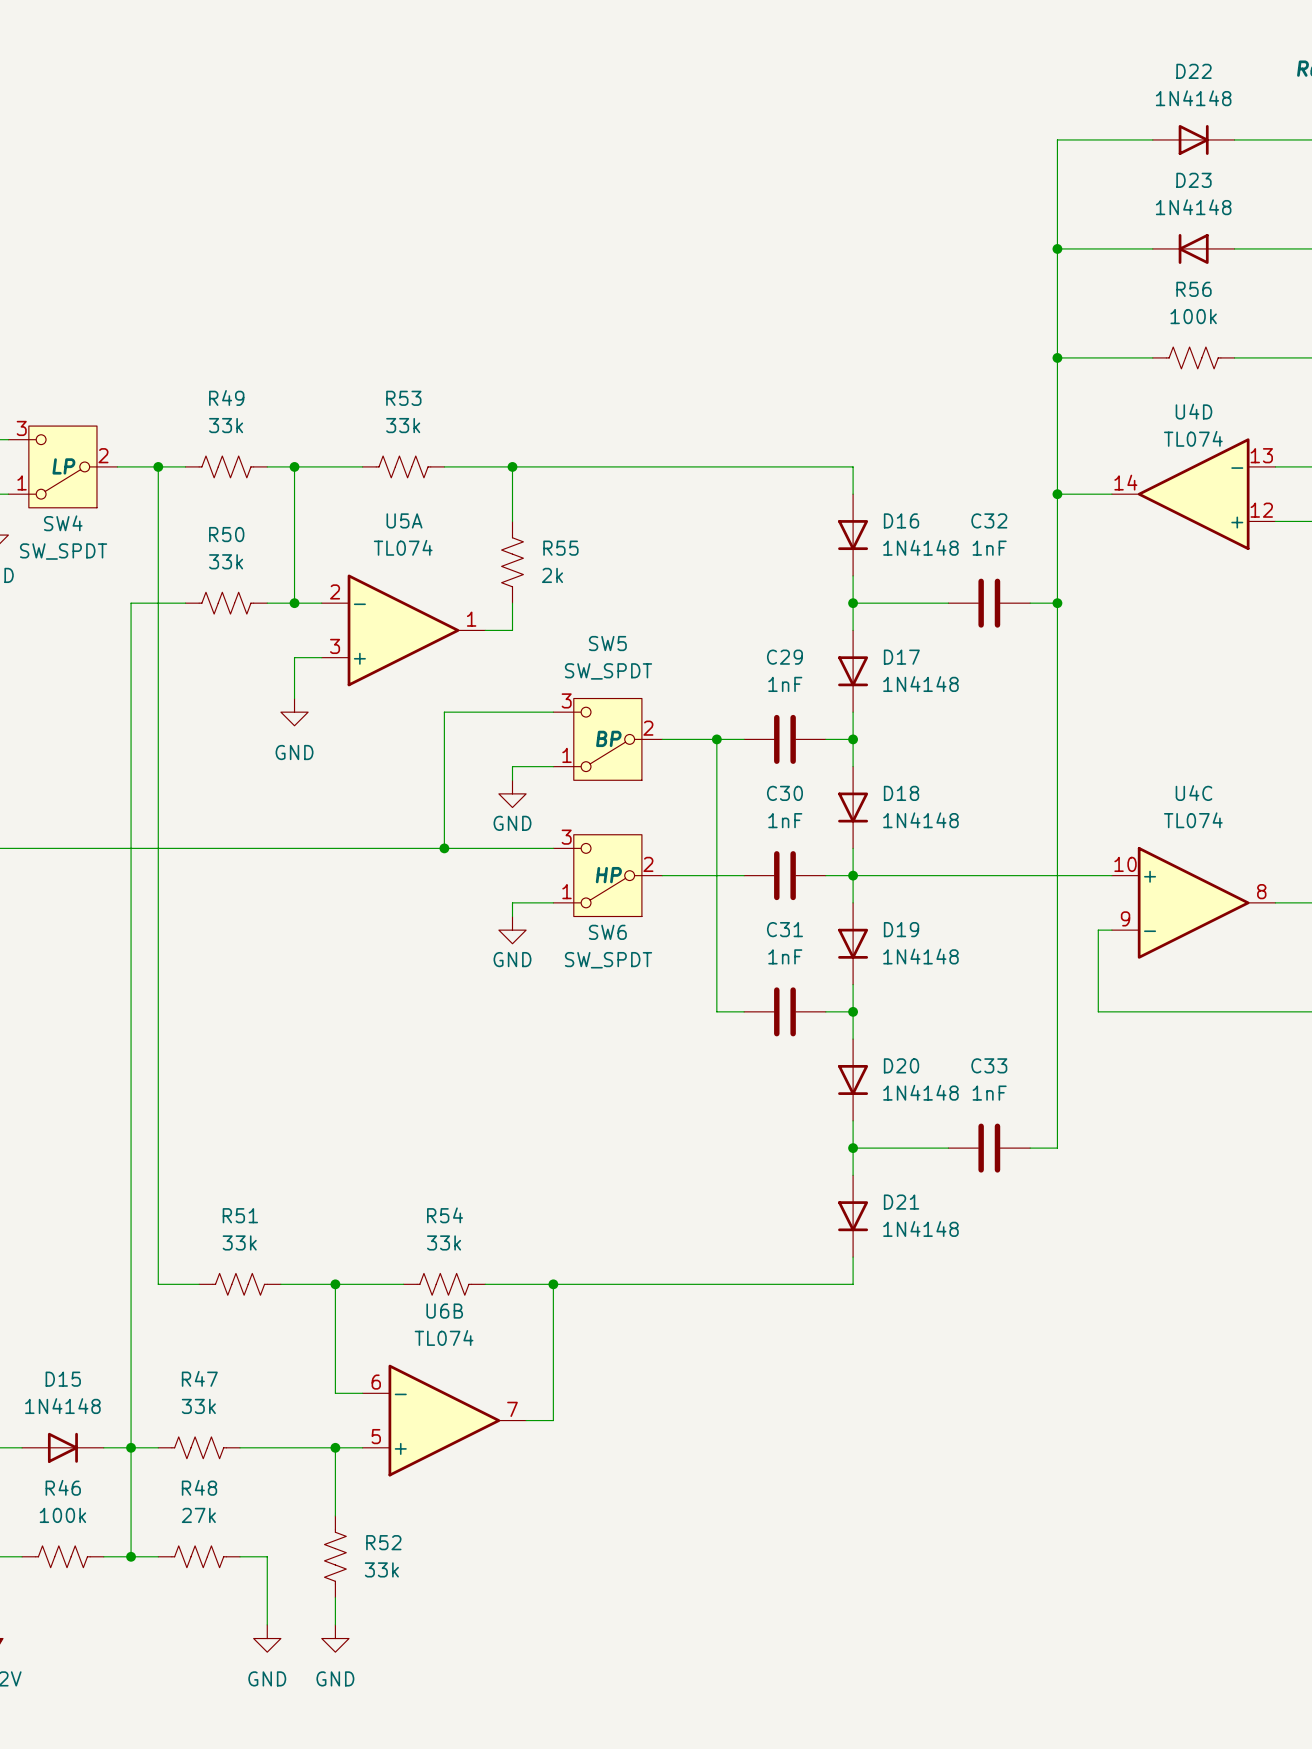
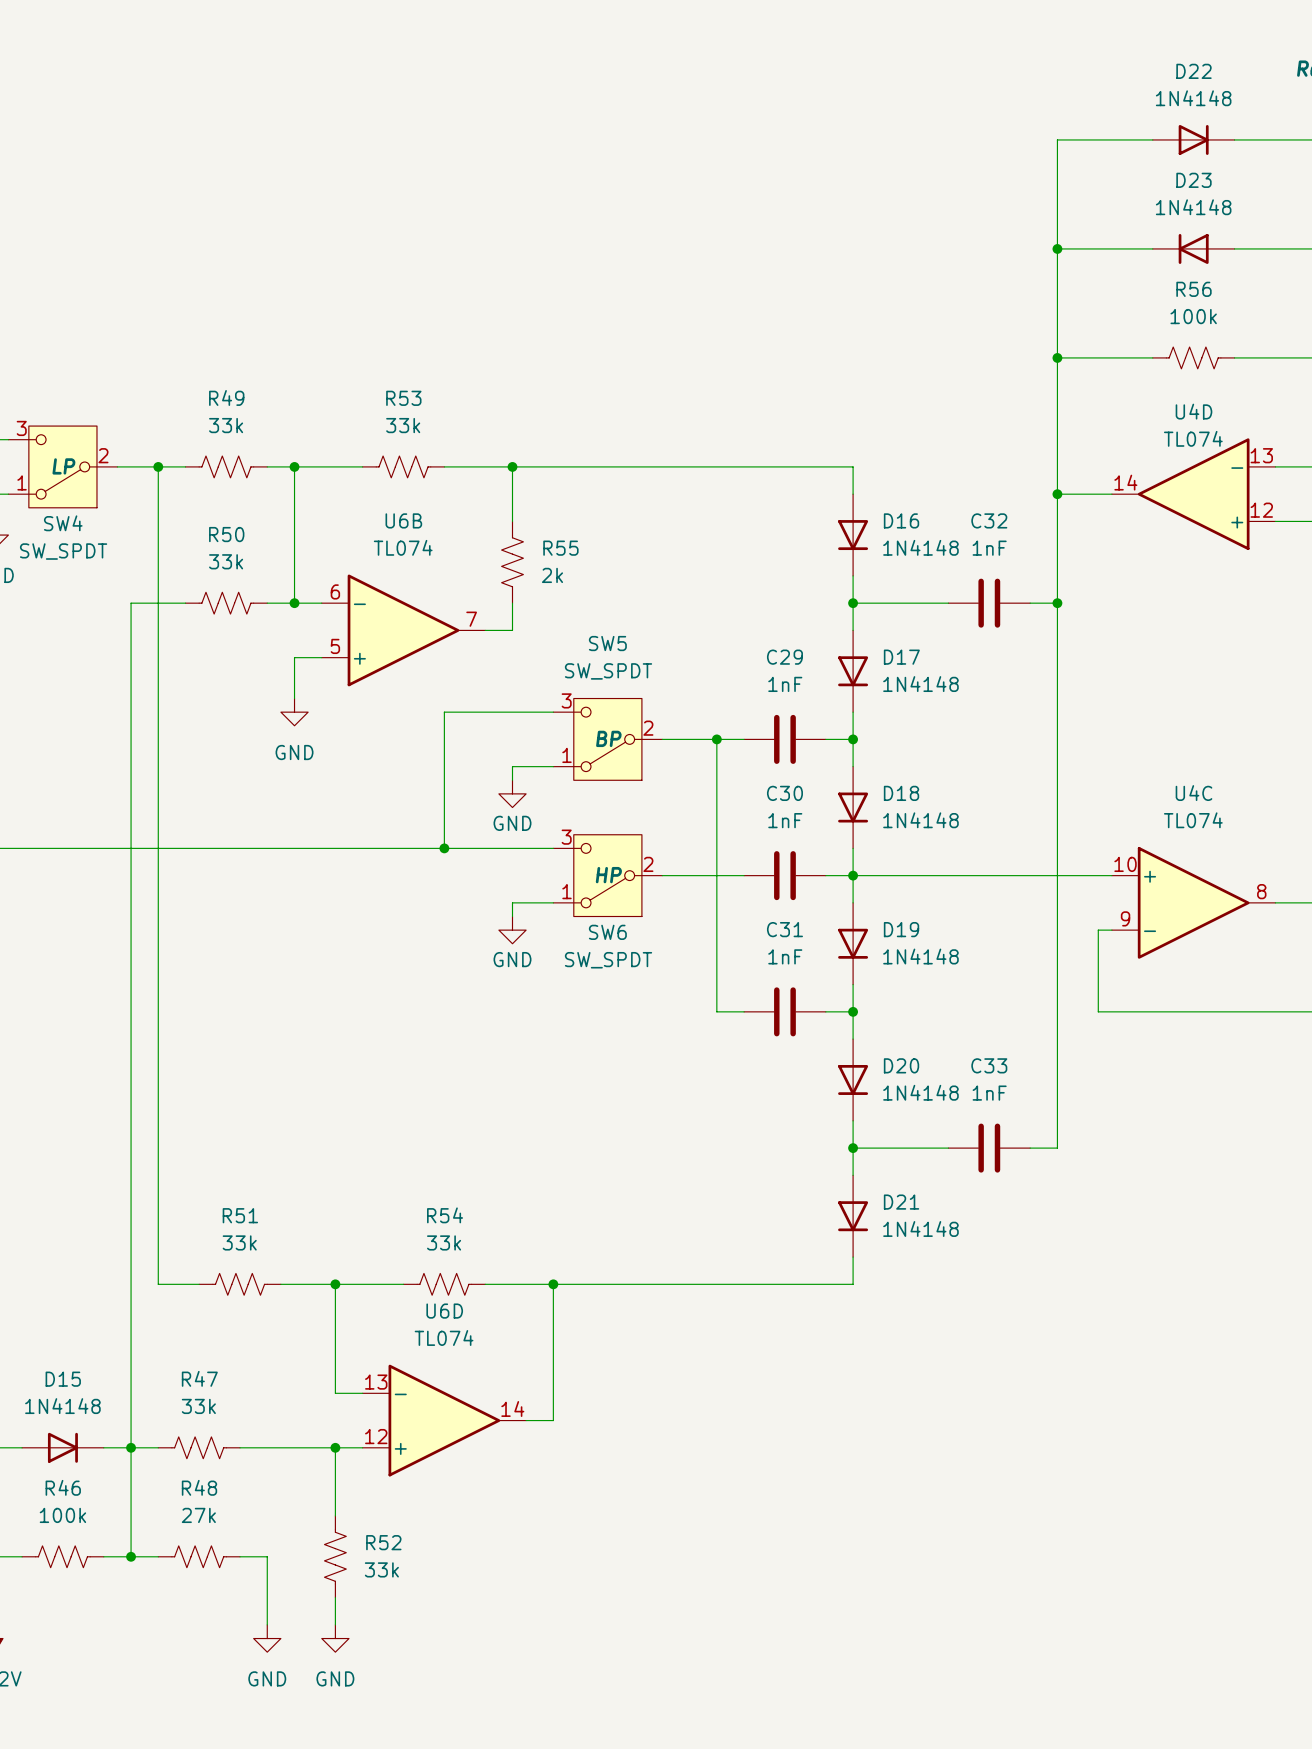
U5A: TL074 (403, 630) -> none
U6B position: (444, 1420) -> (403, 630)
U6D: none -> TL074 (444, 1420)

